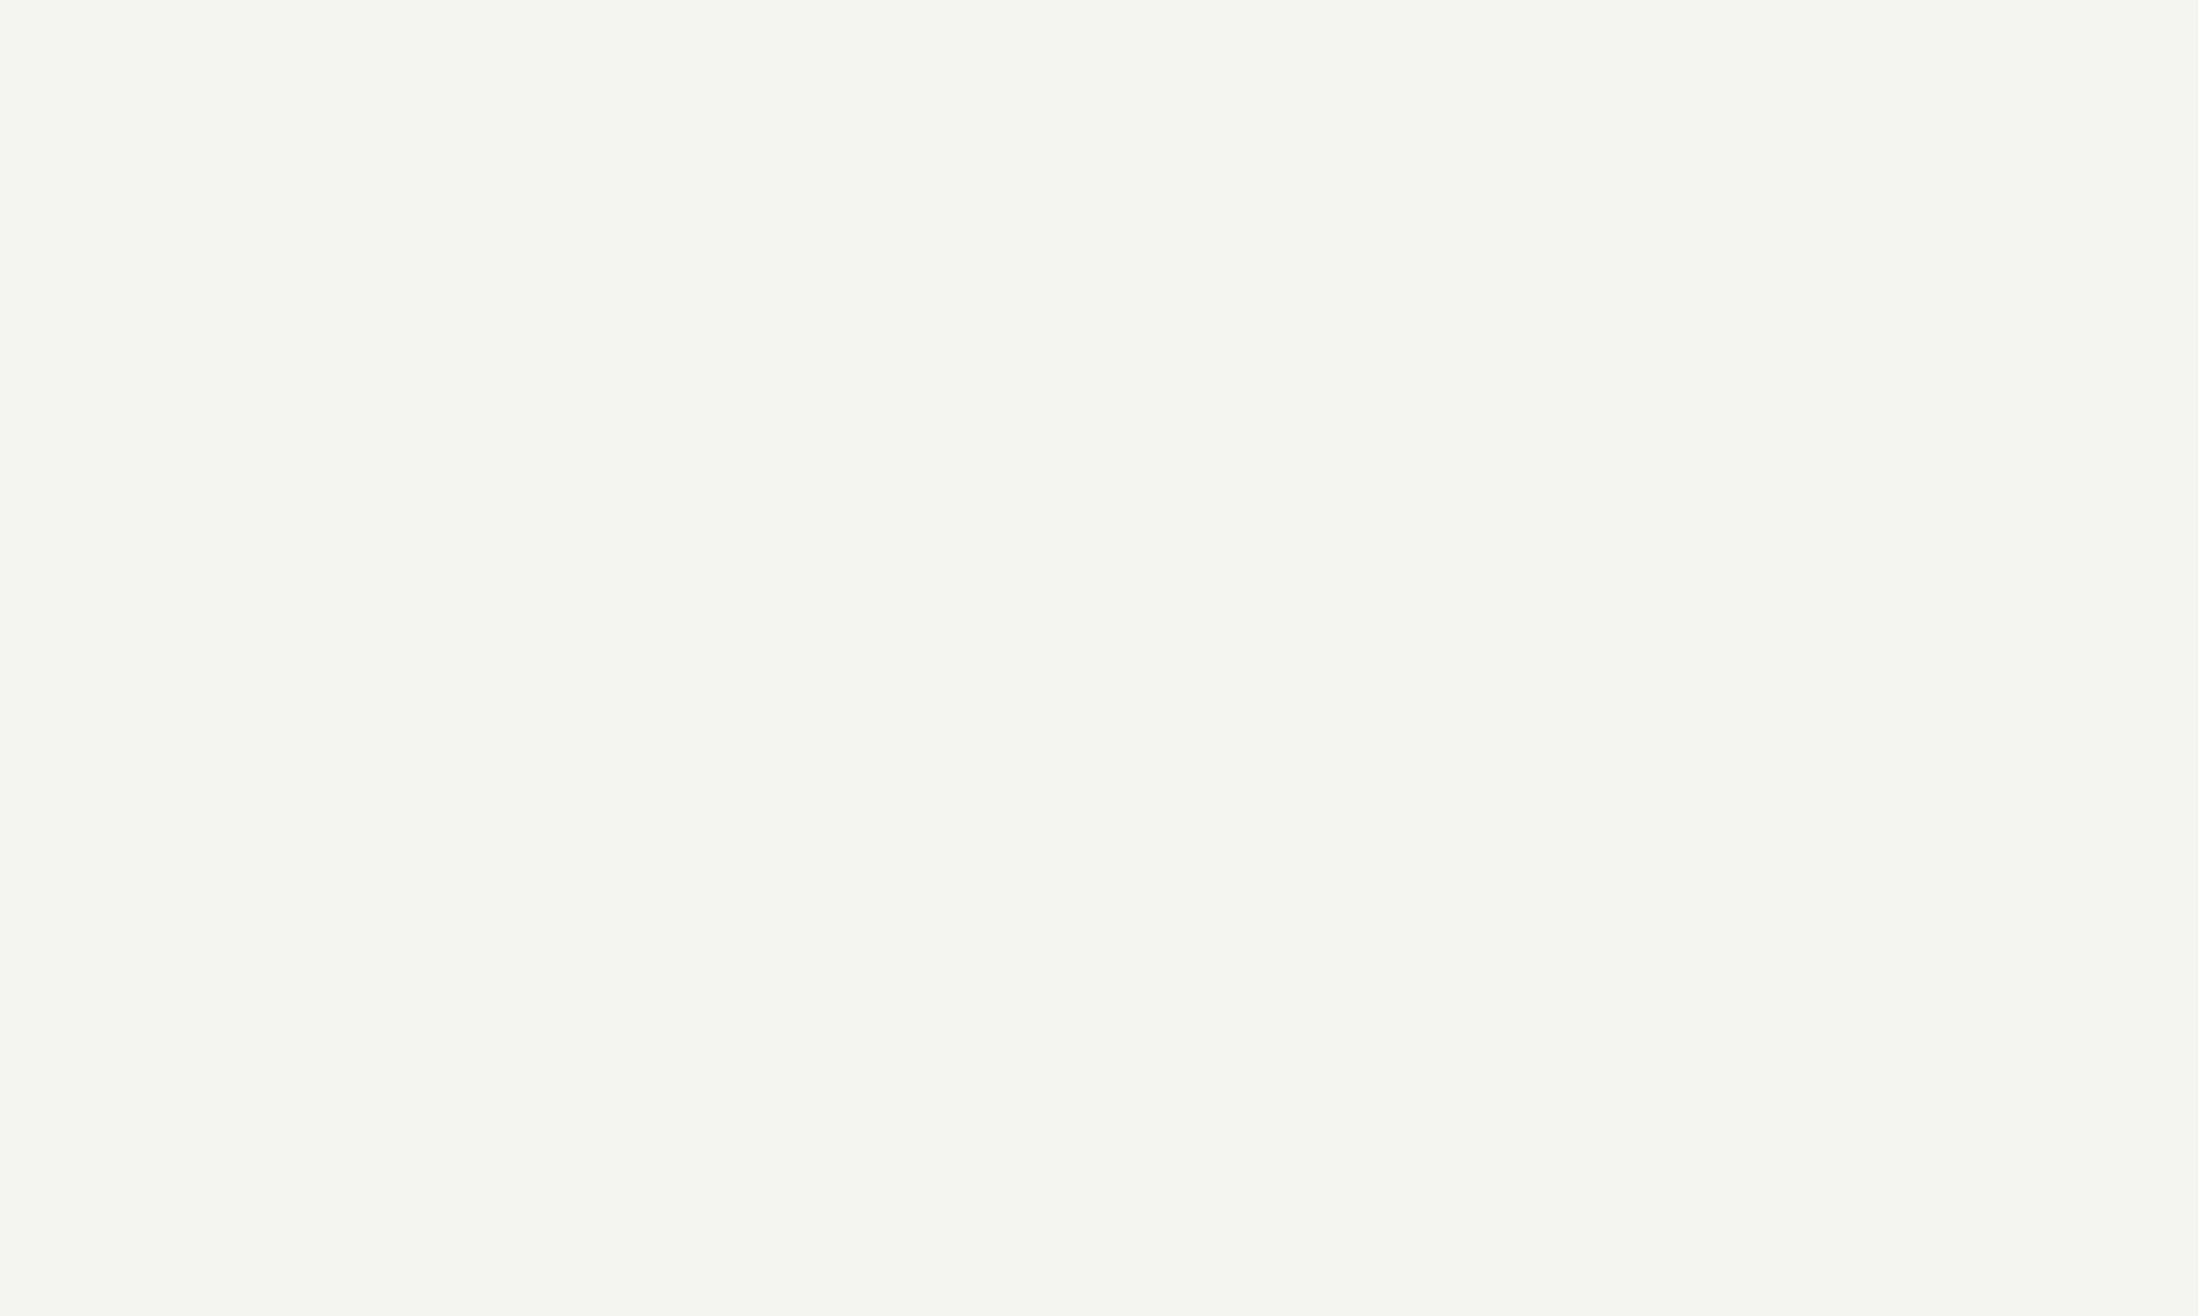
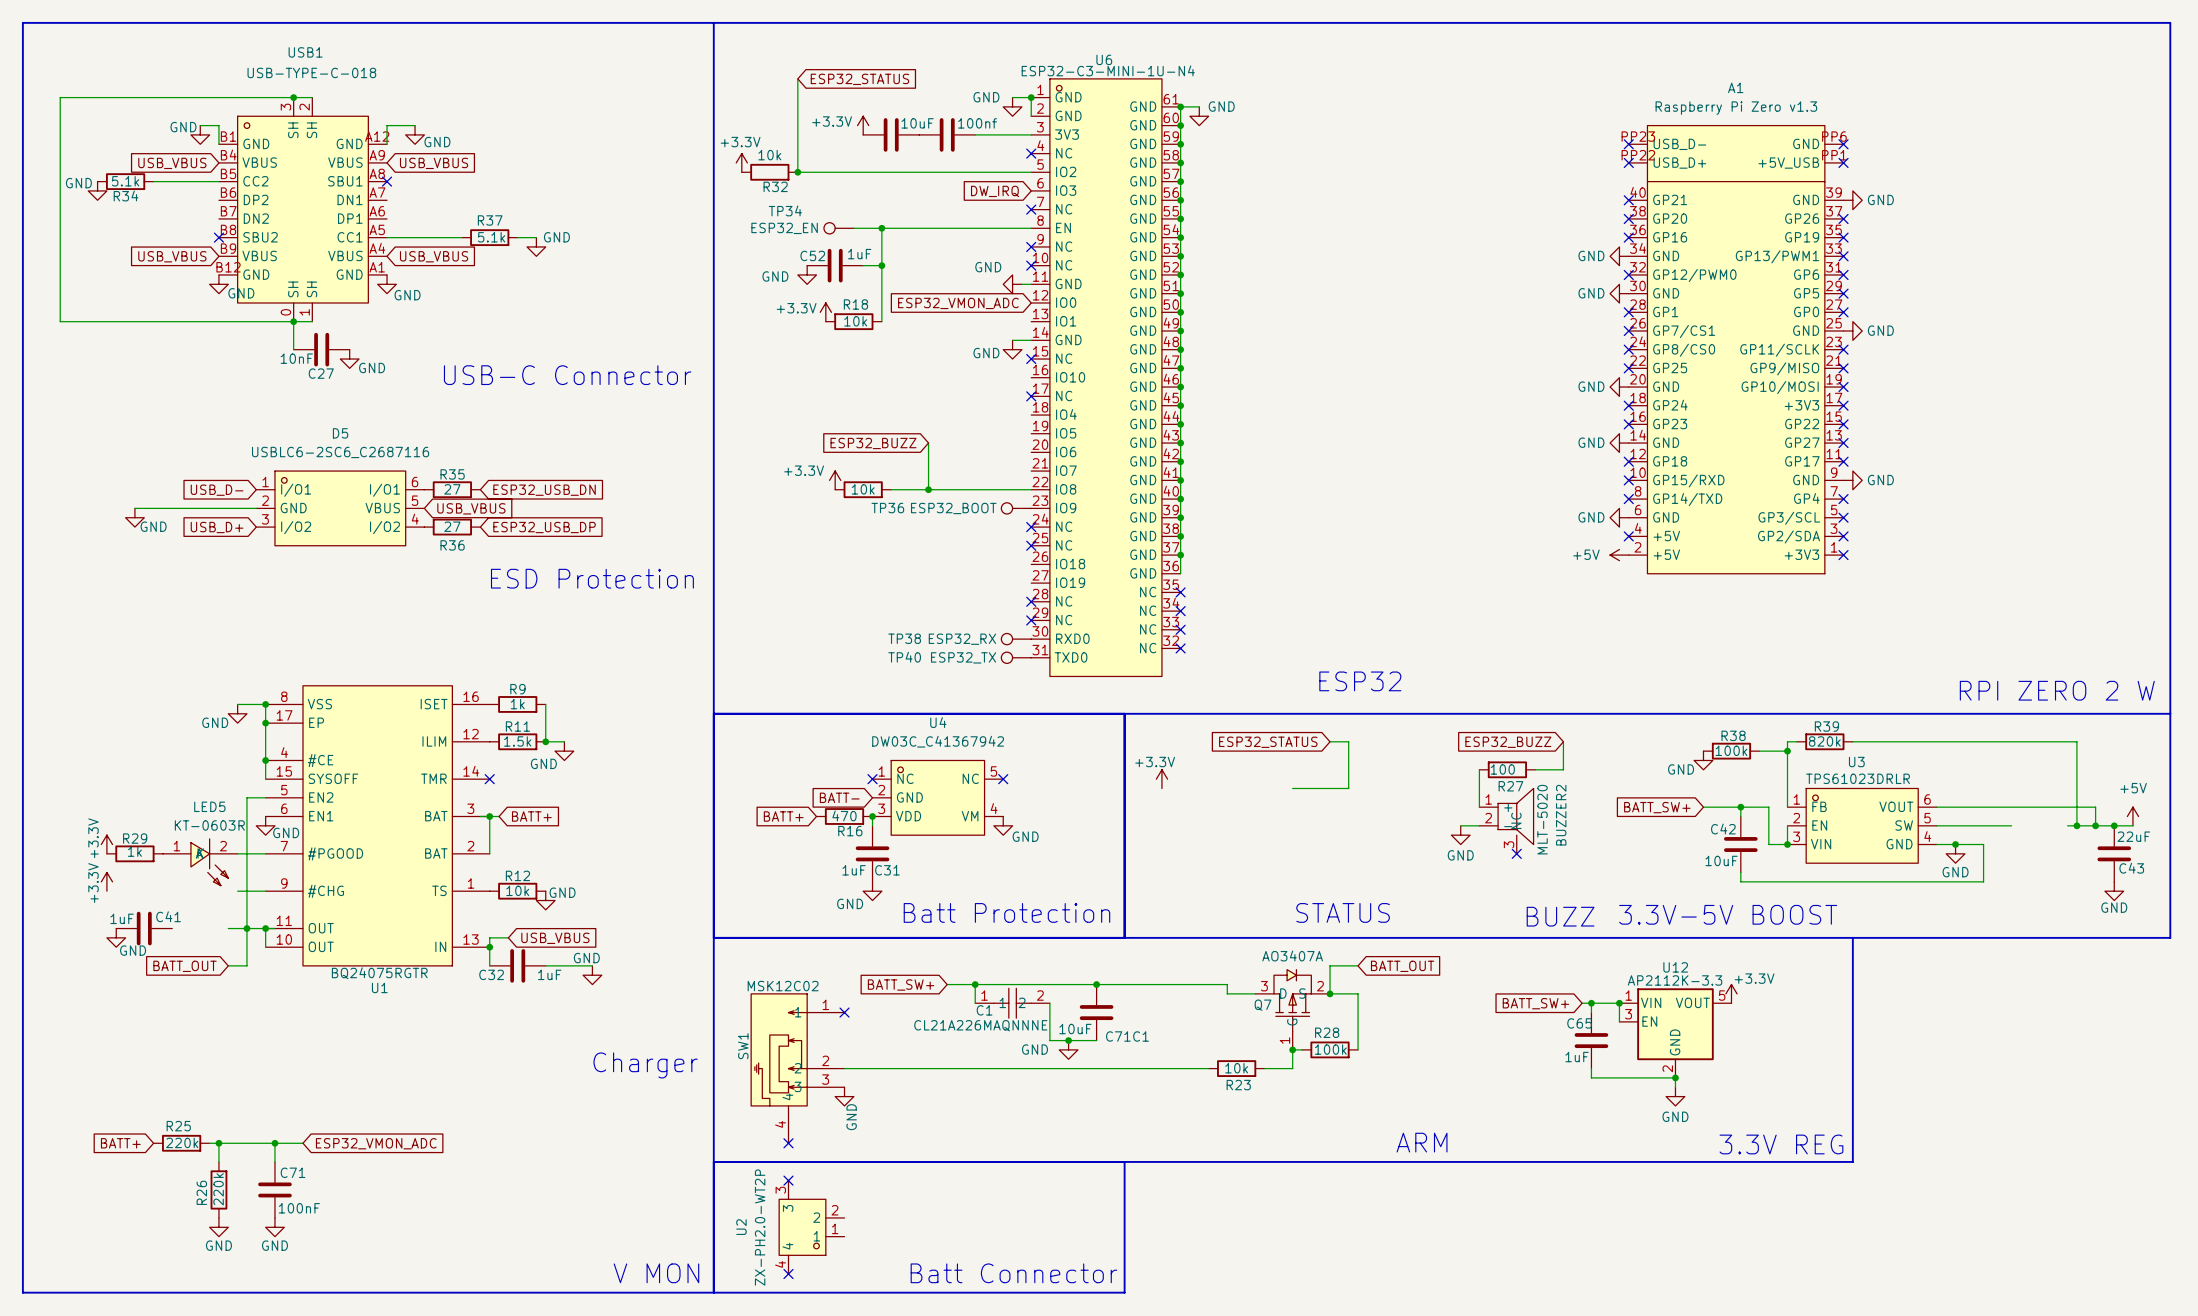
line: none -> (713, 22) (713, 1292)
wire: none -> (797, 78) (797, 172) (1031, 172)
global label: none -> ESP32_STATUS (859, 79)
junction: none -> (293, 97)
wire: none -> (312, 97) (60, 97) (60, 321) (312, 321)
wire: none -> (1012, 97) (1031, 97) (1031, 116)
junction: none -> (1031, 97)
power symbol: none -> GND (1012, 106)
junction: none -> (1180, 106)
wire: none -> (1199, 106) (1180, 106) (1180, 573)
power symbol: none -> GND (1199, 116)
wire: none -> (200, 125) (218, 125) (218, 144)
wire: none -> (415, 125) (387, 125) (387, 144)
power symbol: none -> +3.3V (863, 125)
junction: none -> (1180, 125)
power symbol: none -> GND (200, 134)
power symbol: none -> GND (415, 134)
part: none -> 10uF (891, 134)
part: none -> 100nf (947, 134)
wire: none -> (975, 134) (1031, 134)
junction: none -> (1180, 144)
no-connect mark: none -> (1628, 144)
no-connect mark: none -> (1843, 144)
no-connect mark: none -> (1031, 153)
power symbol: none -> +3.3V (741, 162)
junction: none -> (1180, 162)
no-connect mark: none -> (1628, 162)
no-connect mark: none -> (1843, 162)
global label: none -> USB_VBUS (172, 163)
global label: none -> USB_VBUS (434, 163)
R32: none -> 10k (769, 172)
junction: none -> (797, 172)
R34: none -> 5.1k (125, 181)
wire: none -> (153, 181) (218, 181)
no-connect mark: none -> (387, 181)
junction: none -> (1180, 181)
power symbol: none -> GND (97, 190)
global label: none -> DW_IRQ (995, 191)
junction: none -> (1180, 200)
no-connect mark: none -> (1628, 200)
power symbol: none -> GND (1852, 200)
USB1: none -> USB-TYPE-C-018 (302, 209)
no-connect mark: none -> (1031, 209)
junction: none -> (1180, 218)
no-connect mark: none -> (1628, 218)
no-connect mark: none -> (1843, 218)
TP34: none -> ESP32_EN (838, 228)
wire: none -> (853, 228) (1031, 228)
wire: none -> (881, 228) (881, 321)
junction: none -> (881, 228)
no-connect mark: none -> (218, 237)
wire: none -> (387, 237) (461, 237)
R37: none -> 5.1k (489, 237)
wire: none -> (517, 237) (536, 237)
junction: none -> (1180, 237)
no-connect mark: none -> (1628, 237)
no-connect mark: none -> (1843, 237)
power symbol: none -> GND (536, 246)
no-connect mark: none -> (1031, 246)
global label: none -> USB_VBUS (172, 256)
global label: none -> USB_VBUS (434, 256)
junction: none -> (1180, 256)
power symbol: none -> GND (1619, 256)
no-connect mark: none -> (1843, 256)
C52: none -> 1uF (835, 265)
wire: none -> (863, 265) (881, 265)
junction: none -> (881, 265)
no-connect mark: none -> (1031, 265)
power symbol: none -> GND (807, 274)
junction: none -> (1180, 274)
no-connect mark: none -> (1628, 274)
no-connect mark: none -> (1843, 274)
power symbol: none -> GND (218, 284)
power symbol: none -> GND (387, 284)
power symbol: none -> GND (1012, 284)
wire: none -> (1021, 284) (1031, 284)
junction: none -> (1180, 293)
power symbol: none -> GND (1619, 293)
no-connect mark: none -> (1843, 293)
global label: none -> ESP32_VMON_ADC (958, 303)
power symbol: none -> +3.3V (825, 312)
junction: none -> (1180, 312)
no-connect mark: none -> (1628, 312)
no-connect mark: none -> (1843, 312)
wire: none -> (293, 321) (293, 349)
junction: none -> (293, 321)
R18: none -> 10k (853, 321)
junction: none -> (1180, 331)
no-connect mark: none -> (1628, 331)
power symbol: none -> GND (1852, 331)
wire: none -> (1012, 340) (1031, 340)
C27: none -> 10nF (321, 349)
power symbol: none -> GND (1012, 349)
junction: none -> (1180, 349)
no-connect mark: none -> (1628, 349)
A1: none -> Raspberry Pi Zero v1.3 (1736, 349)
no-connect mark: none -> (1843, 349)
power symbol: none -> GND (349, 359)
no-connect mark: none -> (1031, 359)
junction: none -> (1180, 368)
no-connect mark: none -> (1628, 368)
no-connect mark: none -> (1843, 368)
text: none -> USB-C Connector (567, 375)
U6: none -> ESP32-C3-MINI-1U-N4 (1105, 377)
junction: none -> (1180, 387)
power symbol: none -> GND (1619, 387)
no-connect mark: none -> (1843, 387)
no-connect mark: none -> (1031, 396)
junction: none -> (1180, 405)
no-connect mark: none -> (1628, 405)
no-connect mark: none -> (1843, 405)
junction: none -> (1180, 424)
no-connect mark: none -> (1628, 424)
no-connect mark: none -> (1843, 424)
global label: none -> ESP32_BUZZ (873, 443)
wire: none -> (928, 443) (928, 489)
junction: none -> (1180, 443)
power symbol: none -> GND (1619, 443)
no-connect mark: none -> (1843, 443)
junction: none -> (1180, 461)
no-connect mark: none -> (1628, 461)
no-connect mark: none -> (1843, 461)
power symbol: none -> +3.3V (835, 480)
junction: none -> (1180, 480)
no-connect mark: none -> (1628, 480)
power symbol: none -> GND (1852, 480)
R35: none -> 27 (452, 489)
part: none -> 10k (863, 489)
wire: none -> (891, 489) (1031, 489)
junction: none -> (928, 489)
global label: none -> USB_D- (217, 490)
global label: none -> ESP32_USB_DN (544, 490)
junction: none -> (1180, 499)
no-connect mark: none -> (1628, 499)
no-connect mark: none -> (1843, 499)
wire: none -> (134, 508) (256, 508)
D5: none -> USBLC6-2SC6_C2687116 (340, 508)
global label: none -> USB_VBUS (471, 508)
TP36: none -> ESP32_BOOT (1016, 508)
power symbol: none -> GND (134, 517)
junction: none -> (1180, 517)
power symbol: none -> GND (1619, 517)
no-connect mark: none -> (1843, 517)
global label: none -> USB_D+ (217, 527)
R36: none -> 27 (452, 527)
global label: none -> ESP32_USB_DP (544, 527)
no-connect mark: none -> (1031, 527)
junction: none -> (1180, 536)
no-connect mark: none -> (1628, 536)
no-connect mark: none -> (1843, 536)
no-connect mark: none -> (1031, 545)
junction: none -> (1180, 555)
power symbol: none -> +5V (1619, 555)
no-connect mark: none -> (1843, 555)
text: none -> ESD Protection (592, 578)
no-connect mark: none -> (1180, 592)
no-connect mark: none -> (1031, 601)
no-connect mark: none -> (1180, 611)
no-connect mark: none -> (1031, 620)
no-connect mark: none -> (1180, 629)
TP38: none -> ESP32_RX (1016, 639)
no-connect mark: none -> (1180, 648)
TP40: none -> ESP32_TX (1016, 657)
text: none -> ESP32 (1360, 681)
text: none -> RPI ZERO 2 W (2057, 690)
wire: none -> (237, 704) (265, 704) (265, 779)
junction: none -> (265, 704)
R9: none -> 1k (517, 704)
wire: none -> (545, 704) (545, 741) (564, 741)
power symbol: none -> GND (237, 713)
line: none -> (713, 713) (2170, 713)
line: none -> (1124, 713) (1124, 937)
junction: none -> (265, 723)
R11: none -> 1.5k (517, 741)
junction: none -> (545, 741)
wire: none -> (1330, 741) (1348, 741) (1348, 788) (1292, 788)
wire: none -> (1563, 741) (1563, 769) (1535, 769)
wire: none -> (1796, 741) (1787, 741) (1787, 807)
R39: none -> 820k (1824, 741)
wire: none -> (1852, 741) (2076, 741) (2076, 825)
global label: none -> ESP32_STATUS (1268, 742)
global label: none -> ESP32_BUZZ (1508, 742)
power symbol: none -> GND (564, 751)
R38: none -> 100k (1731, 751)
wire: none -> (1759, 751) (1787, 751)
junction: none -> (1787, 751)
junction: none -> (265, 760)
power symbol: none -> GND (1703, 760)
wire: none -> (1479, 769) (1479, 807)
R27: none -> 100 (1507, 769)
no-connect mark: none -> (489, 779)
no-connect mark: none -> (872, 779)
no-connect mark: none -> (1003, 779)
power symbol: none -> +3.3V (1161, 779)
wire: none -> (265, 797) (246, 797) (246, 965) (228, 965)
global label: none -> BATT- (839, 797)
U4: none -> DW03C_C41367942 (937, 797)
global label: none -> BATT_SW+ (1657, 807)
wire: none -> (1703, 807) (1768, 807) (1768, 844) (1787, 844) (1787, 825)
wire: none -> (1740, 807) (1740, 816)
junction: none -> (1740, 807)
wire: none -> (1936, 807) (2095, 807) (2095, 825)
wire: none -> (480, 816) (499, 816)
wire: none -> (489, 816) (489, 853)
junction: none -> (489, 816)
global label: none -> BATT+ (531, 816)
global label: none -> BATT+ (783, 816)
R16: none -> 470 (844, 816)
wire: none -> (872, 816) (872, 825)
junction: none -> (872, 816)
power symbol: none -> +5V (2132, 816)
BUZZER2: none -> MLT-5020 (1506, 821)
power symbol: none -> GND (265, 825)
U1: none -> BQ24075RGTR (377, 825)
power symbol: none -> GND (1003, 825)
wire: none -> (1460, 825) (1479, 825)
U3: none -> TPS61023DRLR (1862, 825)
wire: none -> (1936, 825) (2011, 825)
wire: none -> (2067, 825) (2132, 825)
junction: none -> (2076, 825)
junction: none -> (2095, 825)
junction: none -> (2114, 825)
power symbol: none -> GND (1460, 835)
power symbol: none -> +3.3V (106, 844)
C42: none -> 10uF (1740, 844)
junction: none -> (1787, 844)
wire: none -> (1936, 844) (1983, 844) (1983, 881) (1740, 881) (1740, 872)
junction: none -> (1955, 844)
R29: none -> 1k (134, 853)
wire: none -> (237, 853) (265, 853)
C31: none -> 1uF (872, 853)
no-connect mark: none -> (1516, 853)
power symbol: none -> GND (1955, 853)
C43: none -> 22uF (2114, 853)
LED5: none -> KT-0603R (200, 862)
power symbol: none -> +3.3V (106, 881)
wire: none -> (237, 891) (265, 891)
R12: none -> 10k (517, 891)
power symbol: none -> GND (872, 891)
power symbol: none -> GND (2114, 891)
power symbol: none -> GND (545, 900)
text: none -> Batt Protection (1006, 912)
text: none -> STATUS (1343, 912)
text: none -> 3.3V-5V BOOST (1728, 914)
text: none -> BUZZ (1560, 916)
C41: none -> 1uF (144, 928)
wire: none -> (228, 928) (274, 928)
junction: none -> (246, 928)
wire: none -> (265, 928) (265, 947)
junction: none -> (265, 928)
power symbol: none -> GND (116, 937)
wire: none -> (508, 937) (489, 937) (489, 965)
line: none -> (713, 937) (2170, 937) (2170, 22) (22, 22) (22, 1292) (1124, 1292) (1124, 1161)
line: none -> (1852, 937) (1852, 1161) (713, 1161)
global label: none -> USB_VBUS (555, 938)
junction: none -> (489, 947)
C32: none -> 1uF (517, 965)
wire: none -> (545, 965) (592, 965)
wire: none -> (1358, 965) (1330, 965) (1330, 993) (1358, 993) (1358, 1049)
global label: none -> BATT_OUT (185, 966)
global label: none -> BATT_OUT (1402, 966)
power symbol: none -> GND (592, 975)
wire: none -> (947, 984) (1227, 984) (1227, 993) (1255, 993)
wire: none -> (975, 984) (975, 1003)
junction: none -> (975, 984)
junction: none -> (1096, 984)
global label: none -> BATT_SW+ (901, 985)
junction: none -> (1330, 993)
power symbol: none -> +3.3V (1731, 993)
C1: none -> CL21A226MAQNNNE (1012, 1003)
wire: none -> (1049, 1003) (1049, 1040) (1096, 1040)
global label: none -> BATT_SW+ (1535, 1003)
wire: none -> (1582, 1003) (1619, 1003) (1619, 1021)
wire: none -> (1591, 1003) (1591, 1012)
junction: none -> (1591, 1003)
junction: none -> (1619, 1003)
Q7: none -> AO3407A (1292, 1009)
no-connect mark: none -> (844, 1012)
C71C1: none -> 10uF (1096, 1012)
U12: none -> AP2112K-3.3 (1675, 1033)
junction: none -> (1068, 1040)
C65: none -> 1uF (1591, 1040)
power symbol: none -> GND (1068, 1049)
junction: none -> (1292, 1049)
wire: none -> (1302, 1049) (1292, 1049) (1292, 1068) (1264, 1068)
R28: none -> 100k (1330, 1049)
text: none -> Charger (645, 1065)
SW1: none -> MSK12C02 (797, 1068)
wire: none -> (844, 1068) (1208, 1068)
R23: none -> 10k (1236, 1068)
wire: none -> (1591, 1068) (1591, 1077) (1675, 1077) (1675, 1087)
junction: none -> (1675, 1077)
power symbol: none -> GND (844, 1096)
power symbol: none -> GND (1675, 1096)
text: none -> ARM (1422, 1142)
global label: none -> BATT+ (120, 1143)
R25: none -> 220k (181, 1143)
wire: none -> (209, 1143) (302, 1143)
wire: none -> (218, 1143) (218, 1161)
junction: none -> (218, 1143)
wire: none -> (274, 1143) (274, 1161)
junction: none -> (274, 1143)
global label: none -> ESP32_VMON_ADC (376, 1143)
no-connect mark: none -> (788, 1143)
text: none -> 3.3V REG (1781, 1144)
no-connect mark: none -> (788, 1180)
R26: none -> 220k (218, 1189)
C71: none -> 100nF (274, 1189)
power symbol: none -> GND (218, 1227)
power symbol: none -> GND (274, 1227)
U2: none -> ZX-PH2.0-WT2P (811, 1227)
text: none -> V MON (656, 1273)
no-connect mark: none -> (788, 1273)
text: none -> Batt Connector (1013, 1273)

